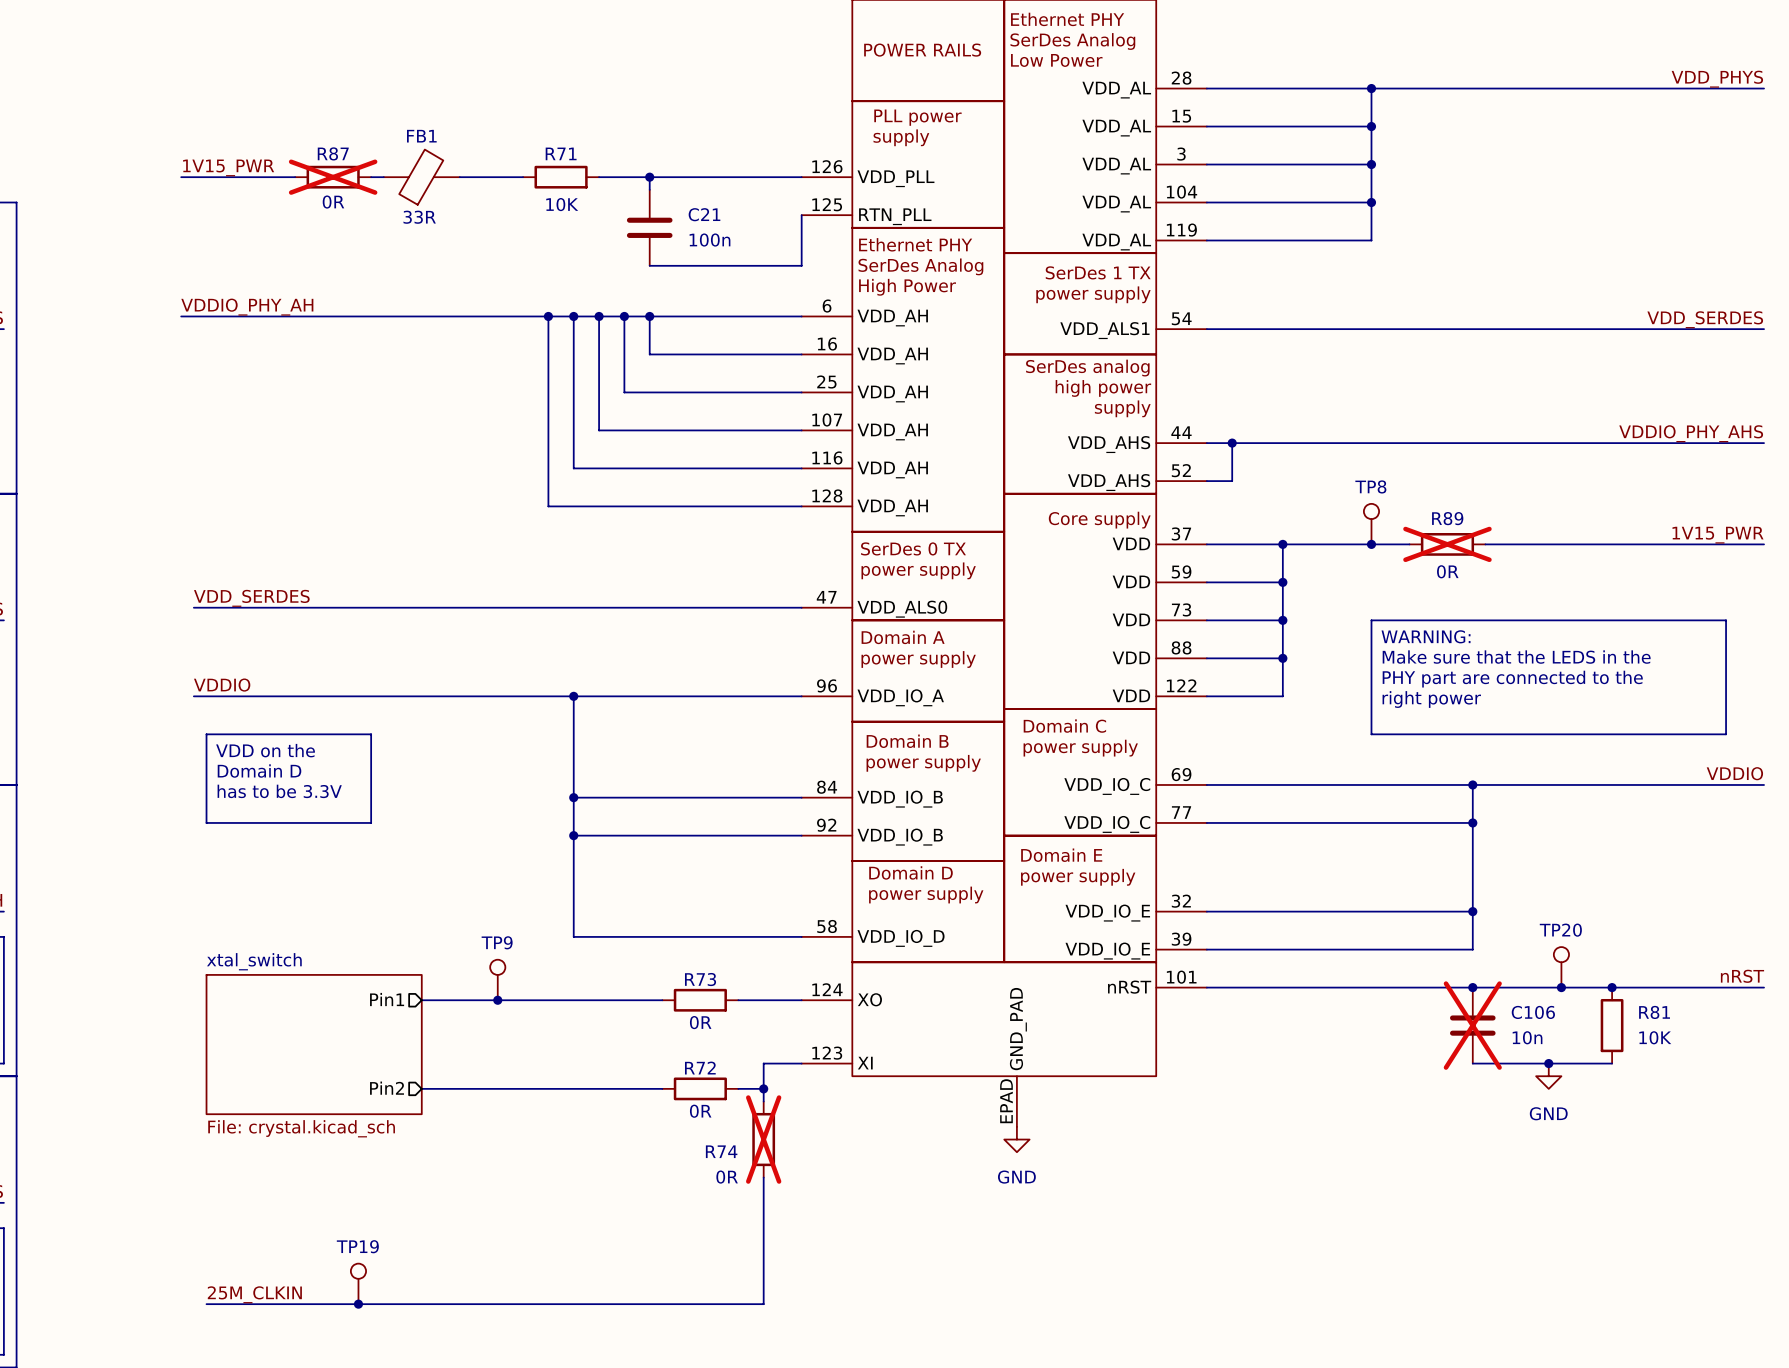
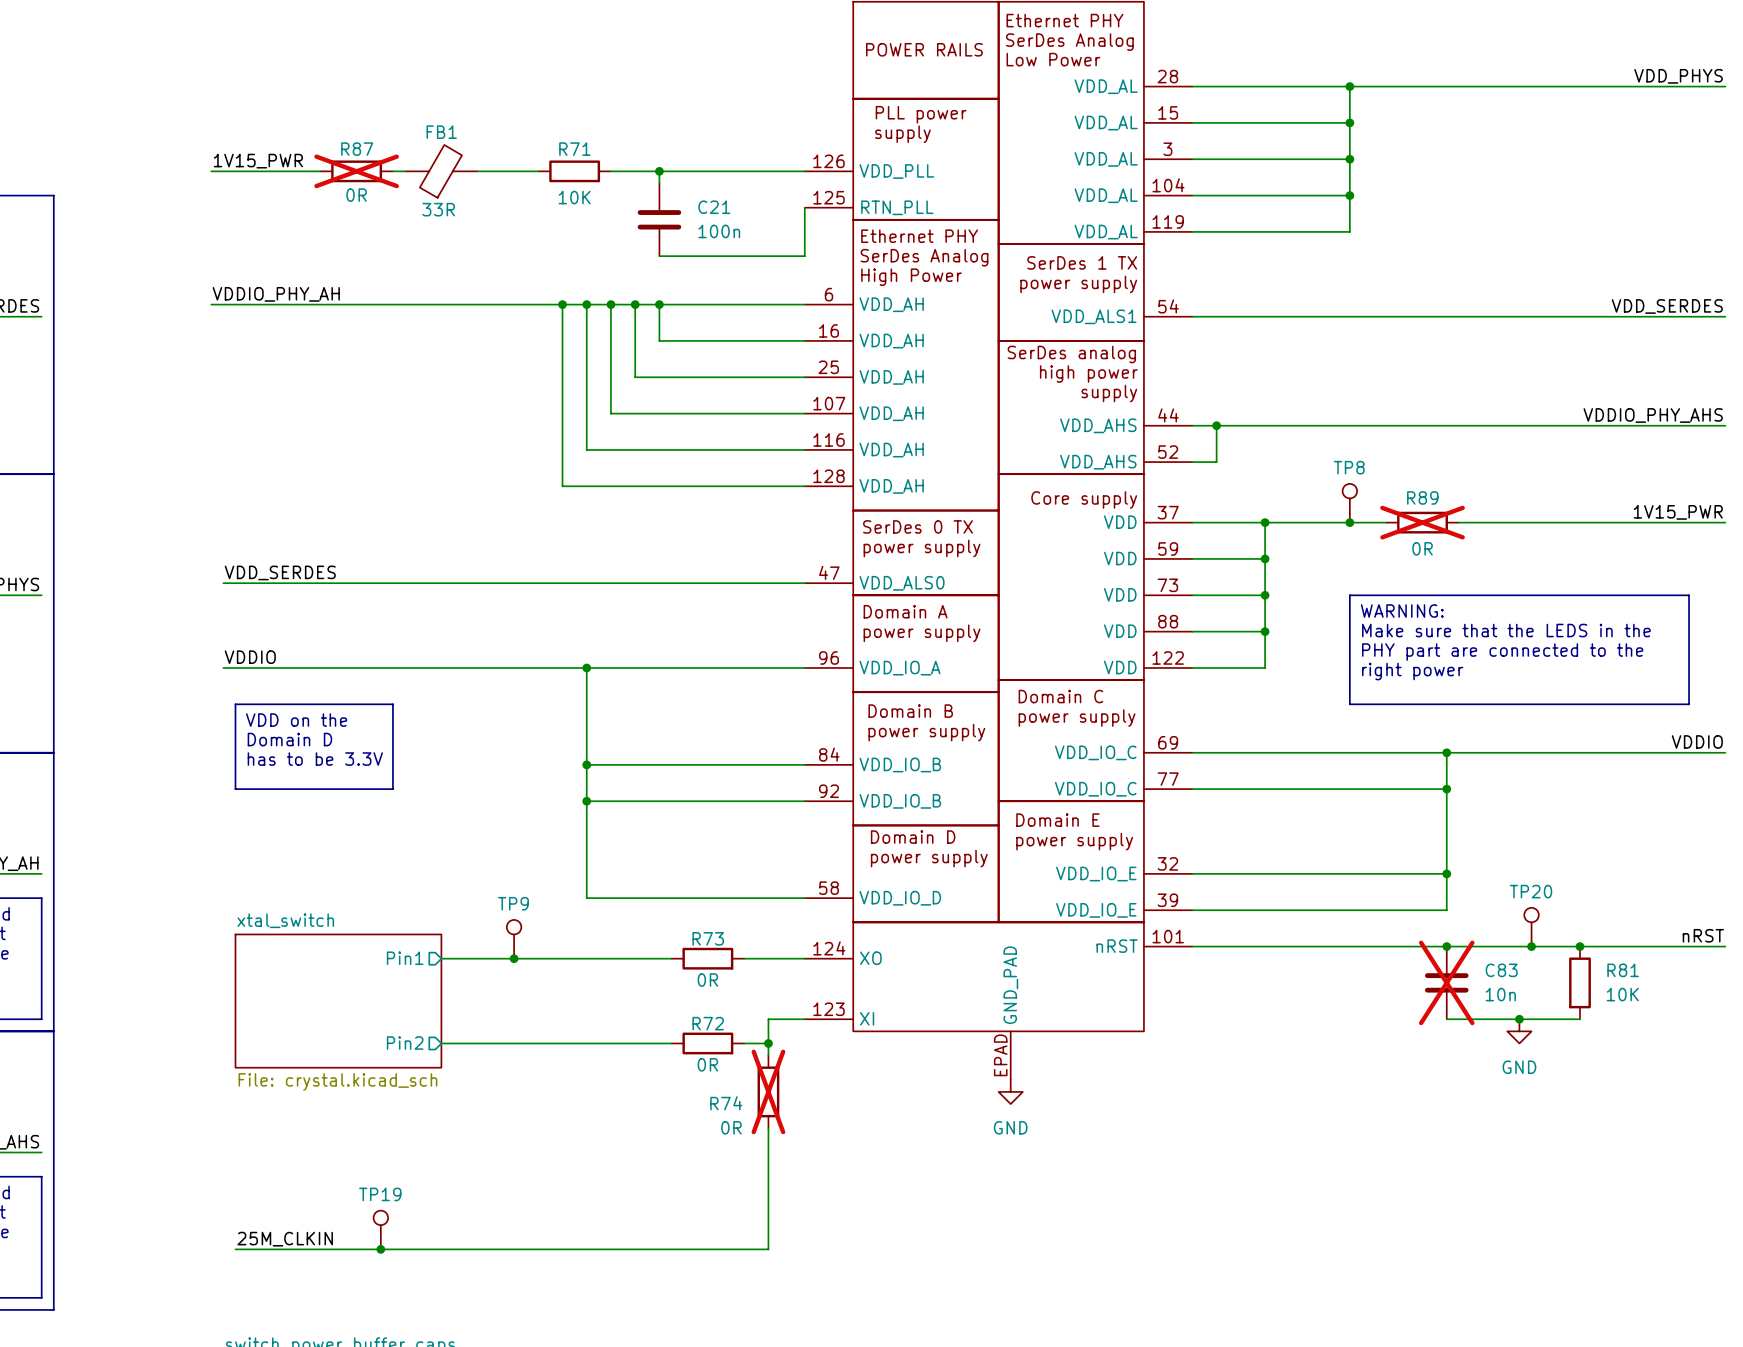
C106 name: C106 (1533, 1012) -> C83 (1501, 970)

